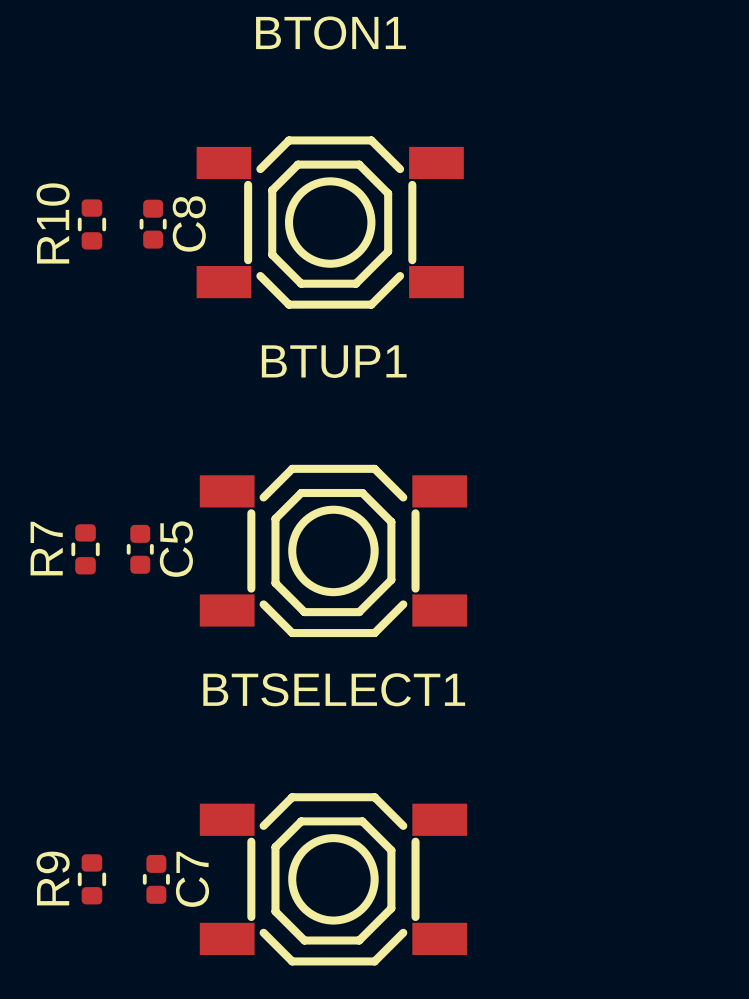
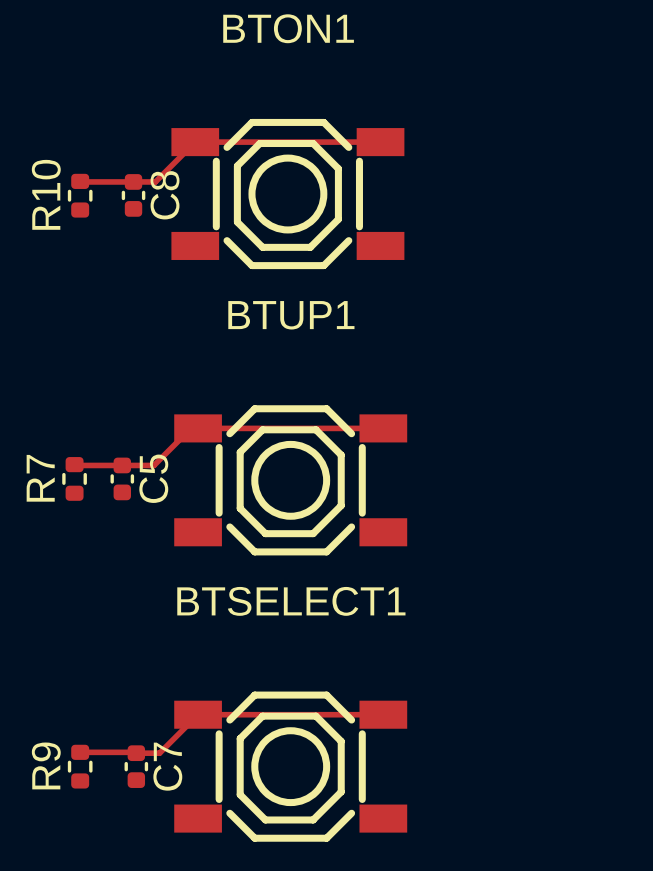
track: none -> (380, 142) (195, 142) (155, 181) (80, 181)
track: none -> (383, 428) (191, 428) (154, 465) (74, 464)
track: none -> (383, 714) (198, 714) (159, 753) (80, 752)

